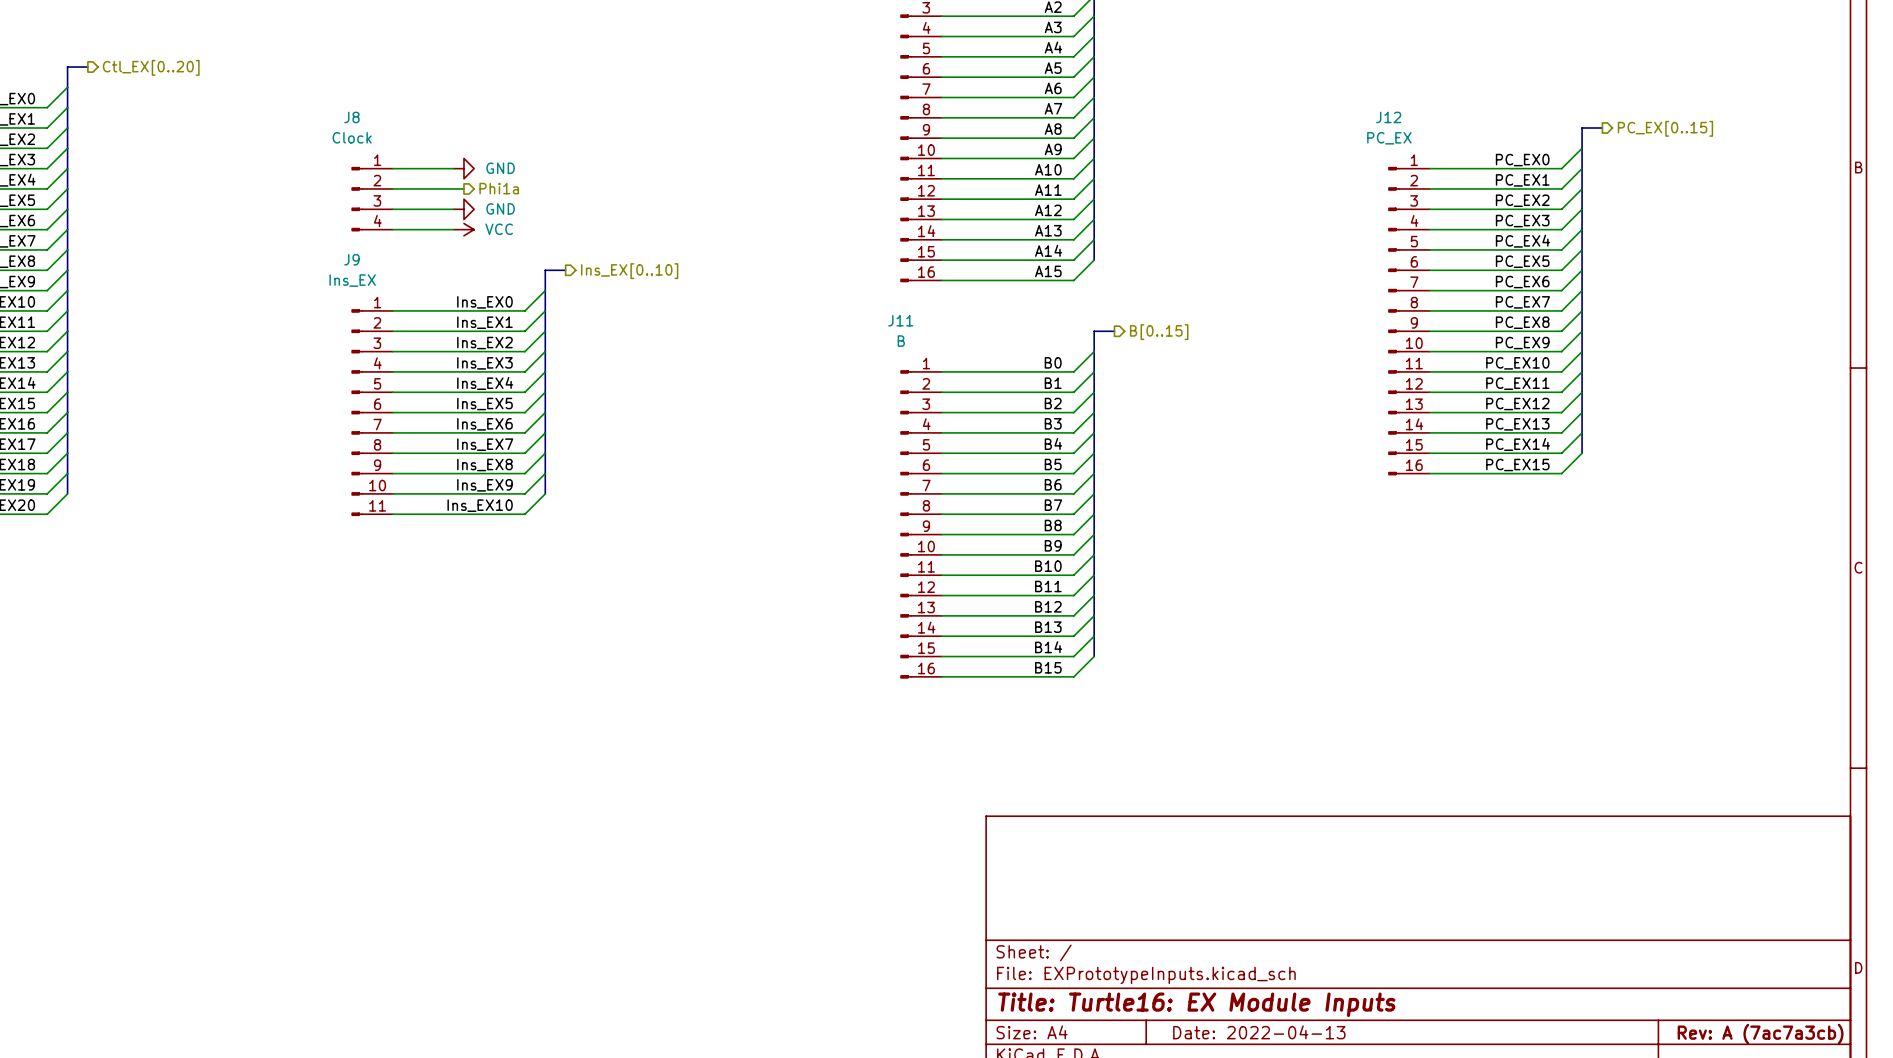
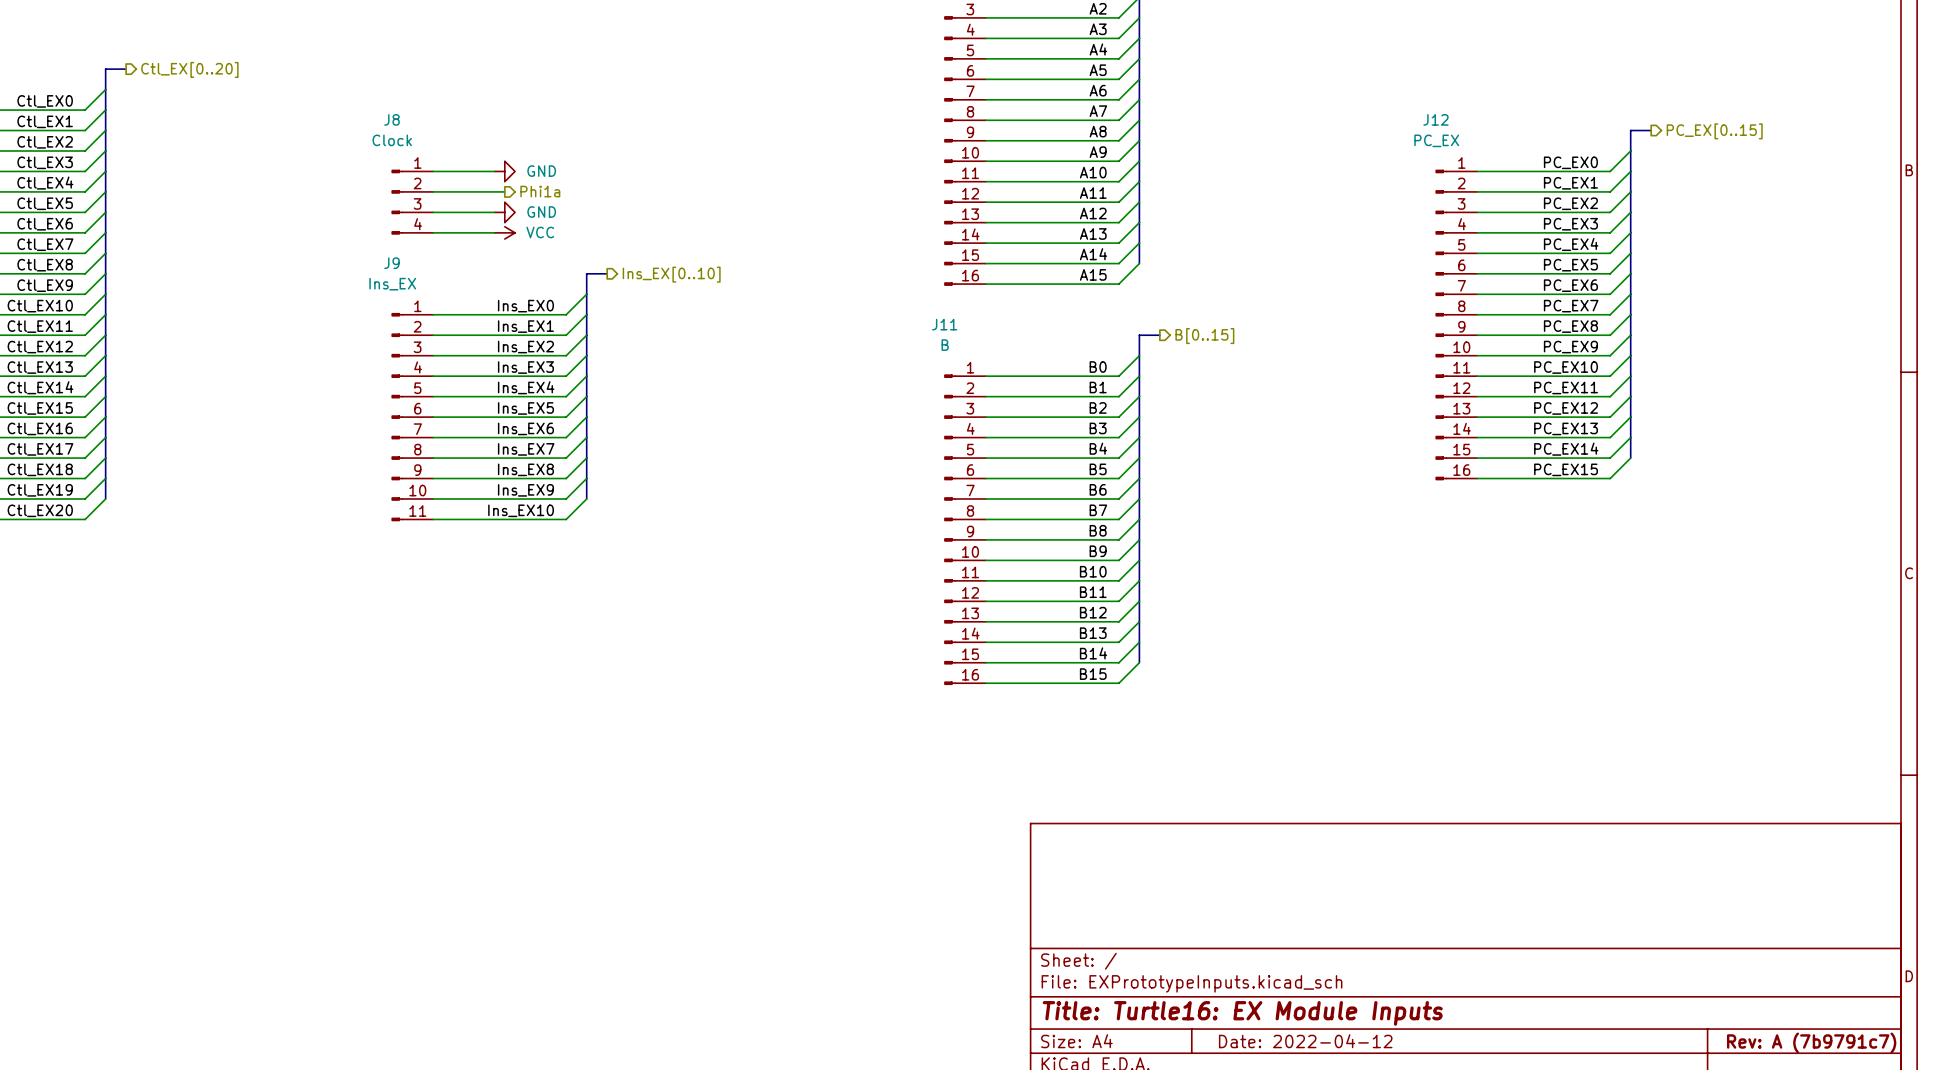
title block: Date: 2022-04-13 (1259, 1032) -> Date: 2022-04-12 (1305, 1041)
title block: Rev: A (7ac7a3cb) (1760, 1034) -> Rev: A (7b9791c7) (1811, 1042)

